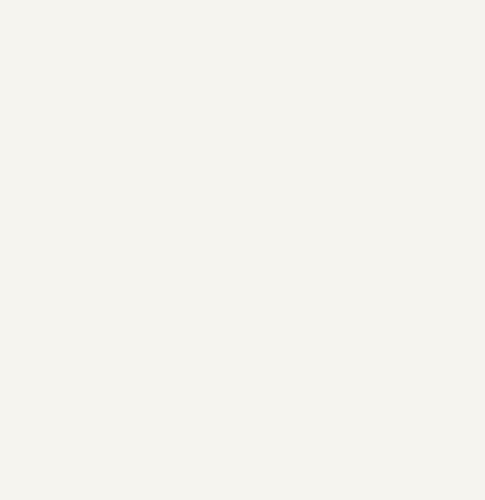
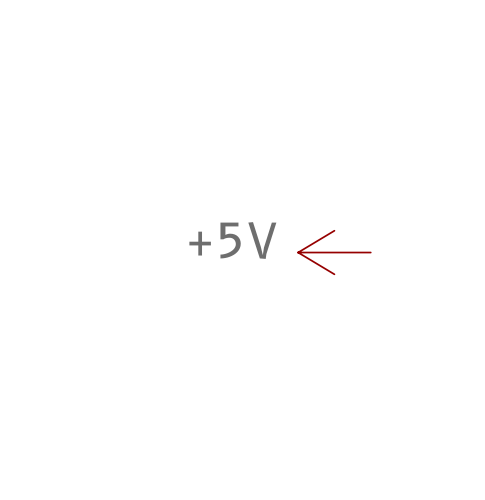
power symbol: none -> +5V (334, 252)

